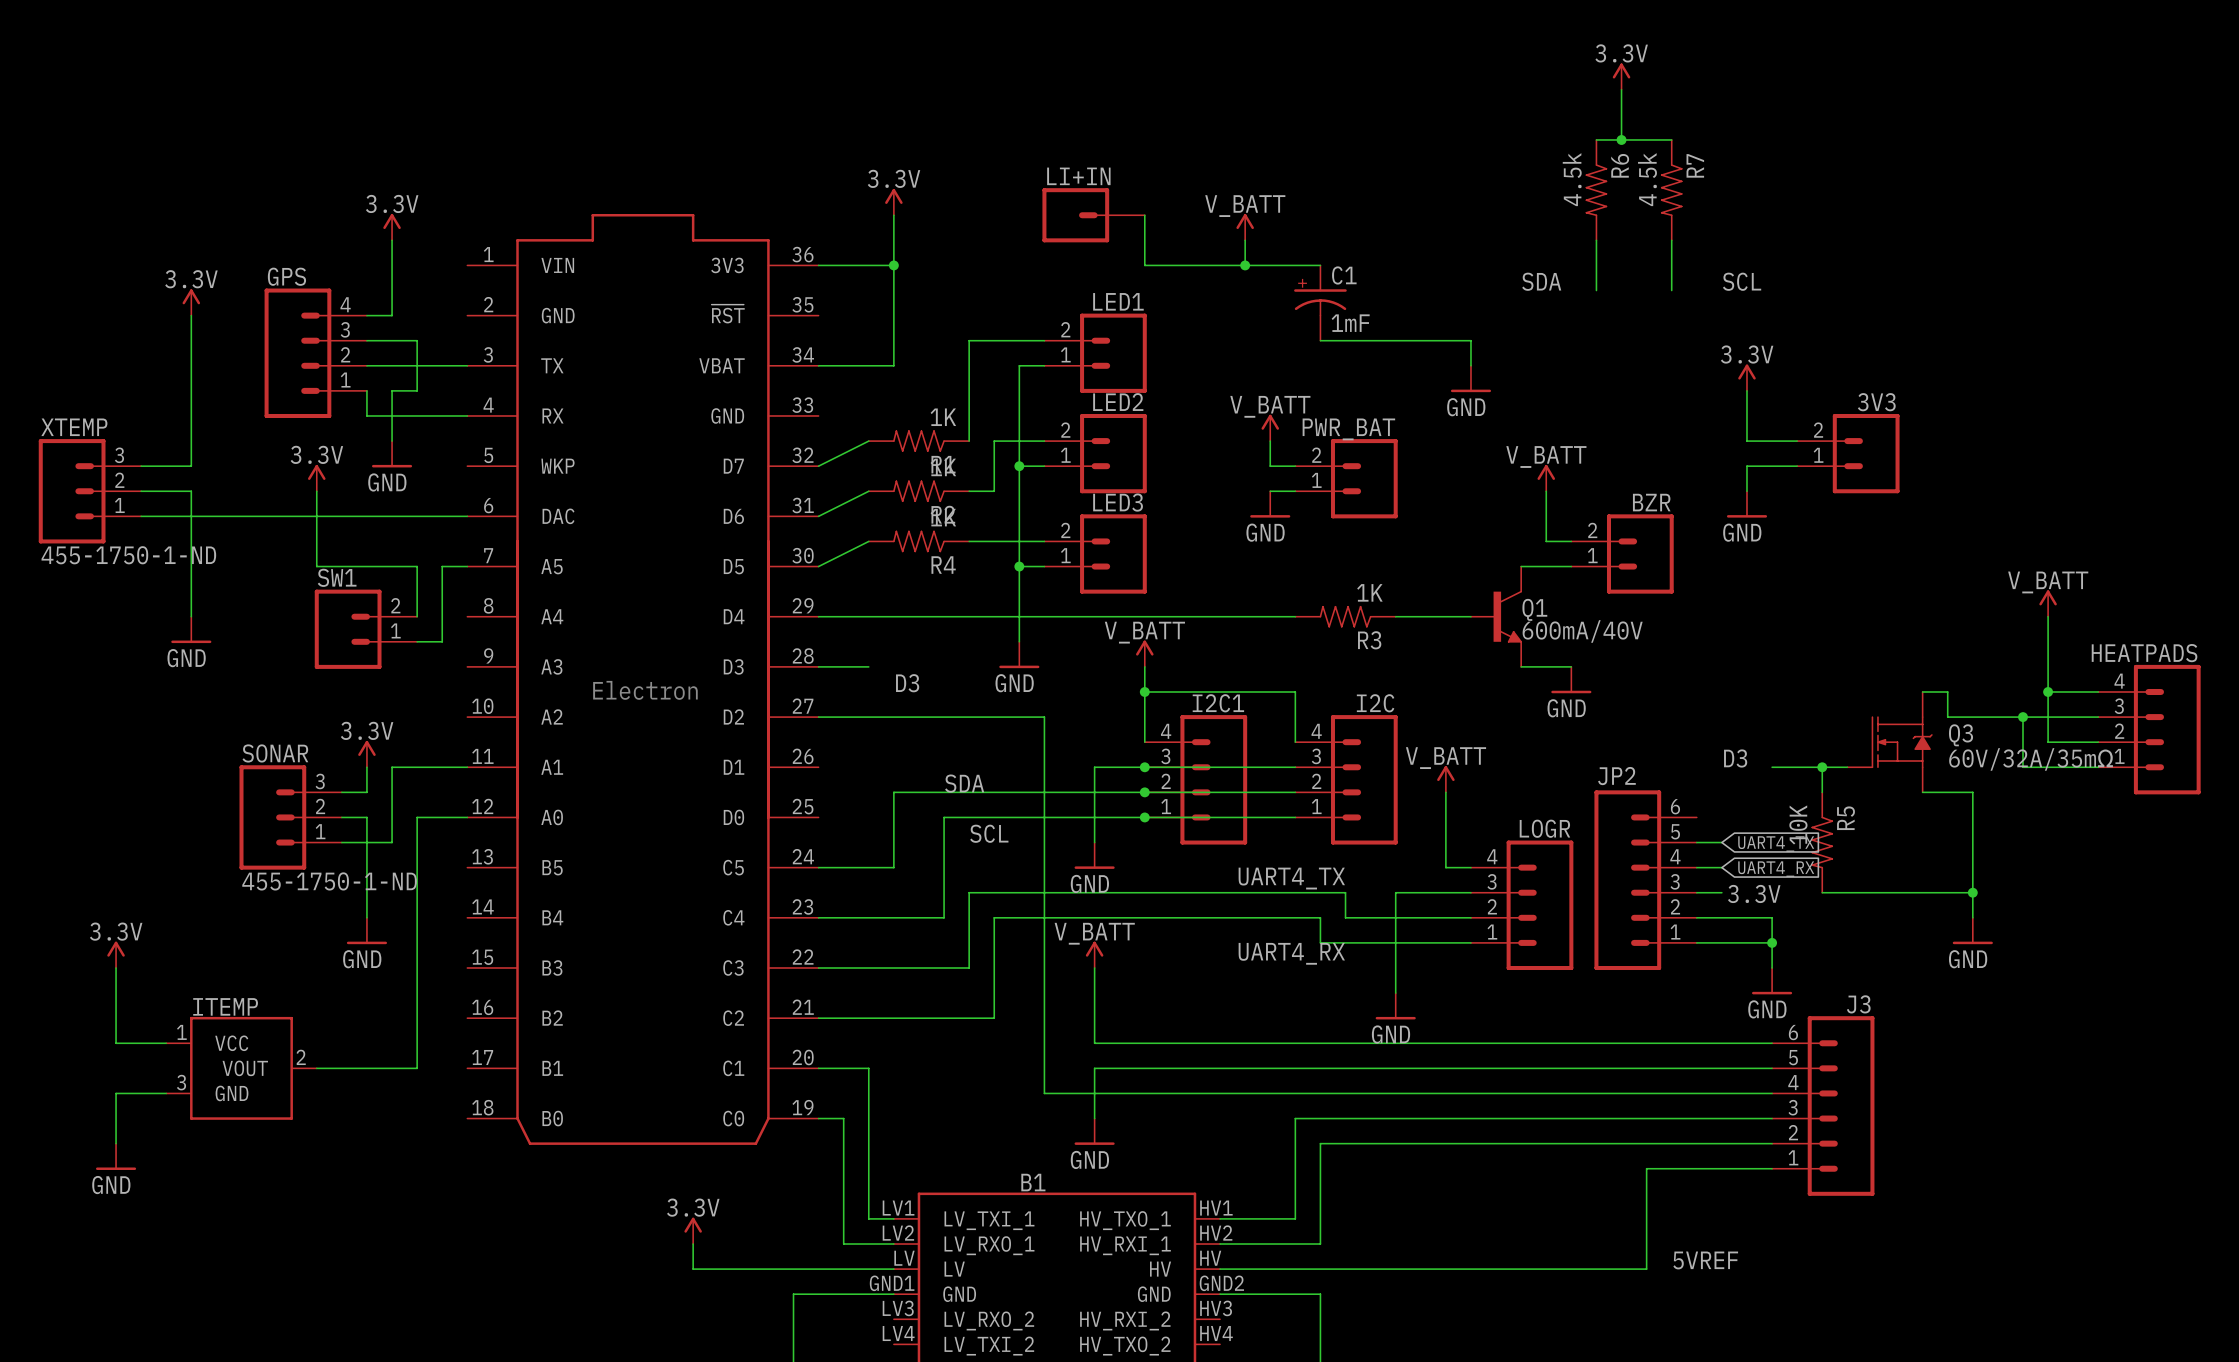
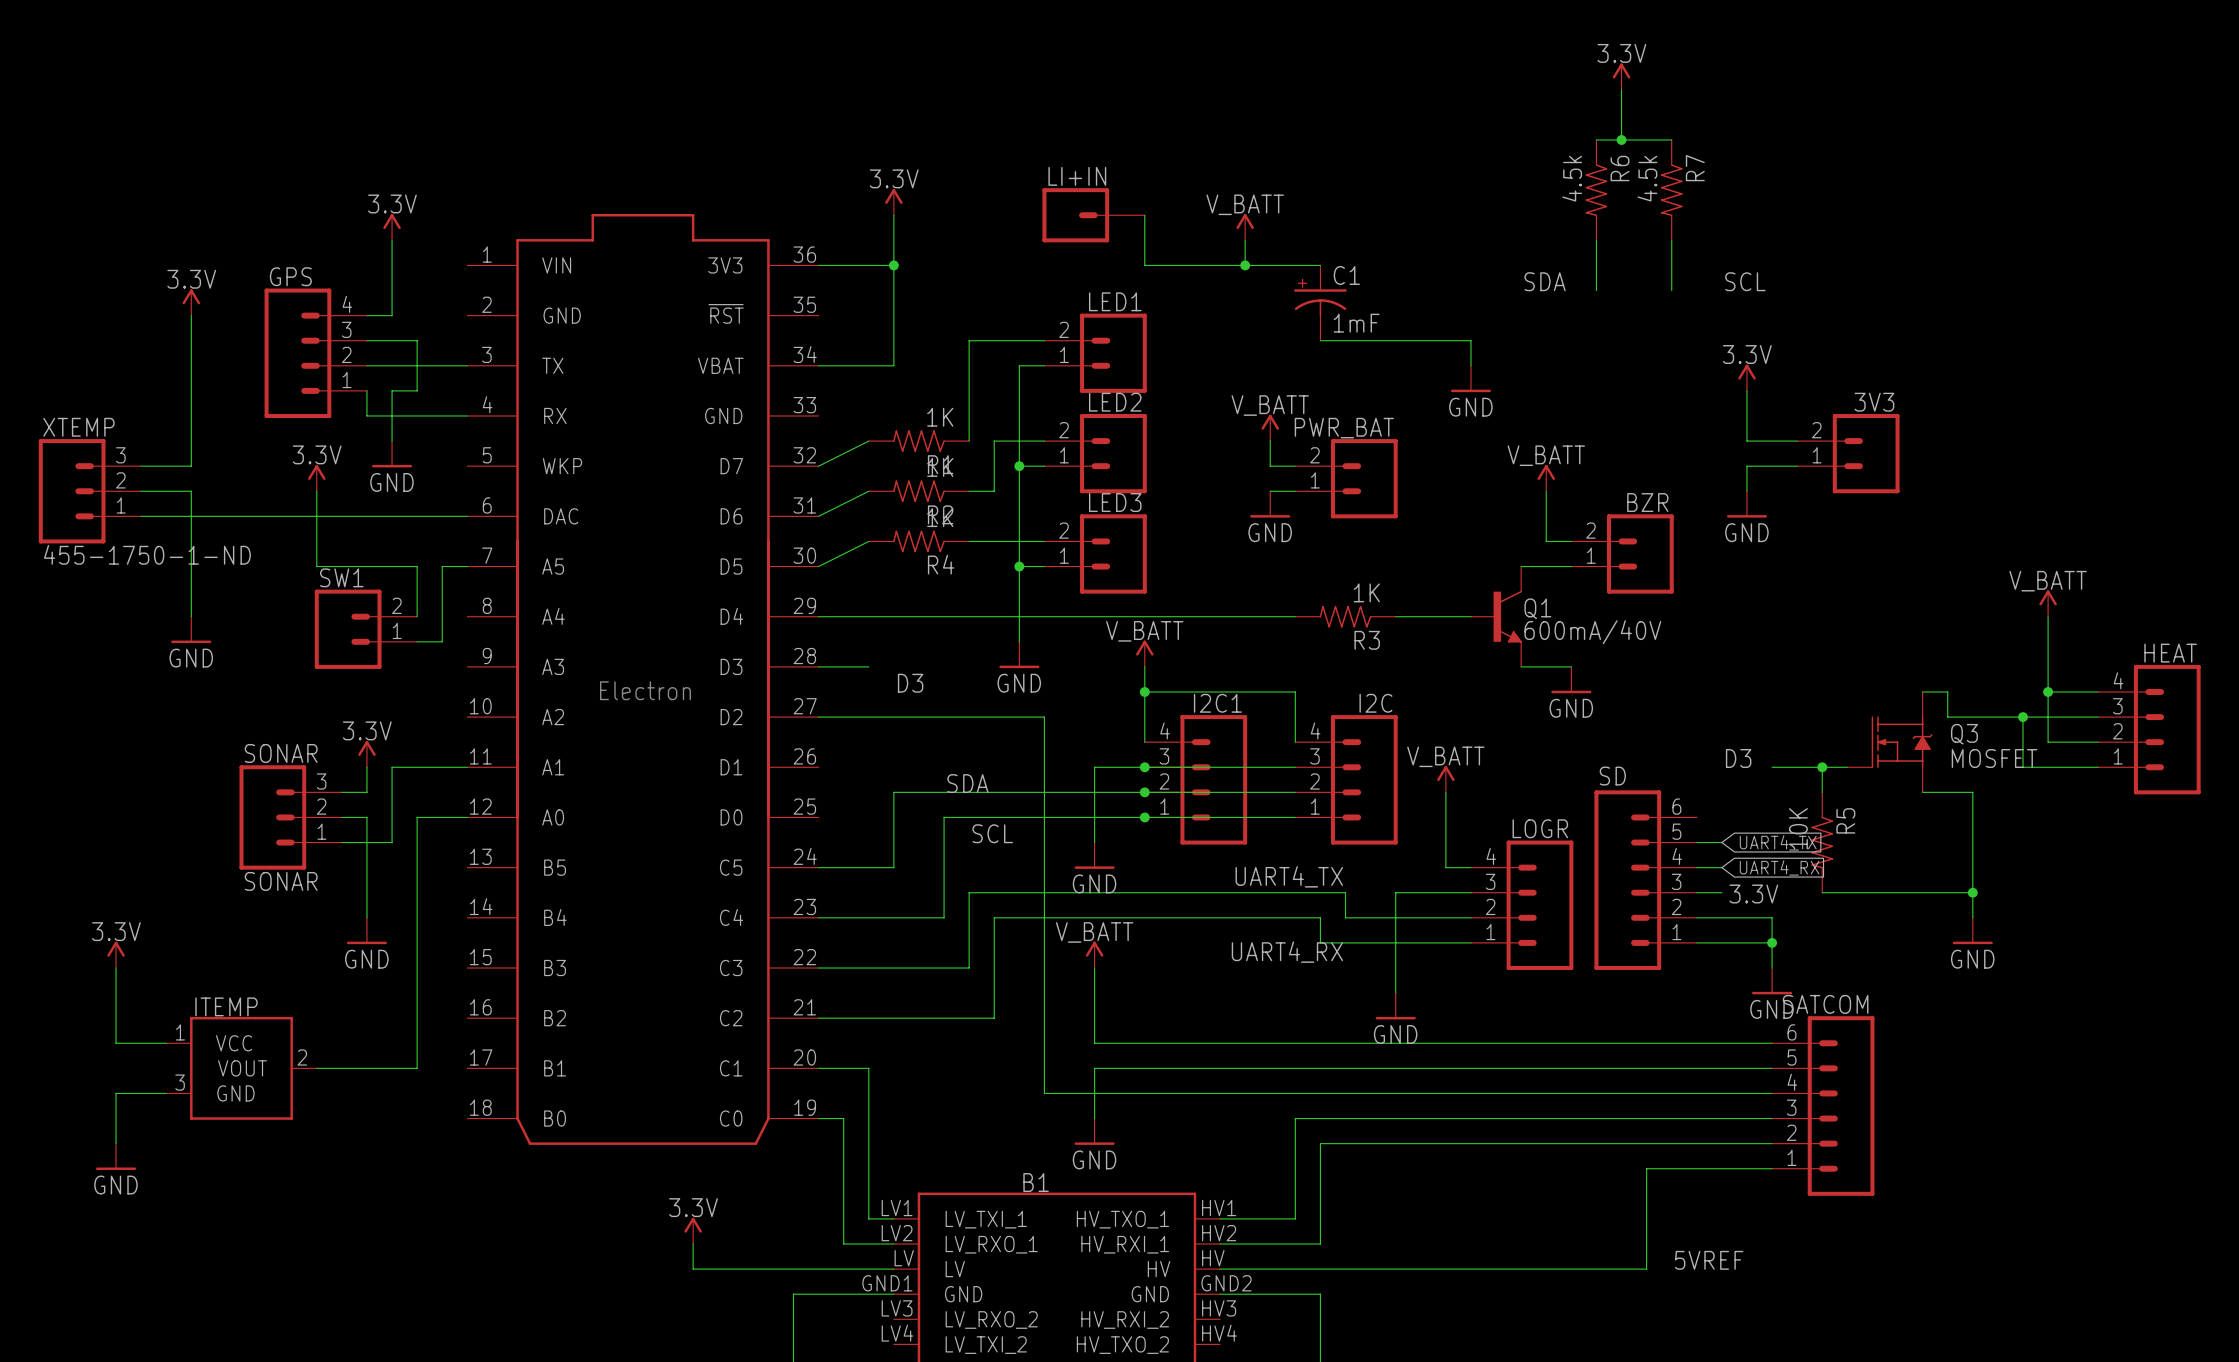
HEATPADS name: HEATPADS (2144, 653) -> HEAT (2170, 653)
Q3 value: 60V/32A/35mΩ (2031, 759) -> MOSFET (1994, 758)
JP2 name: JP2 (1616, 776) -> SD (1612, 776)
SONAR value: 455-1750-1-ND (329, 881) -> SONAR (281, 881)
J3 name: J3 (1858, 1004) -> SATCOM (1825, 1004)

